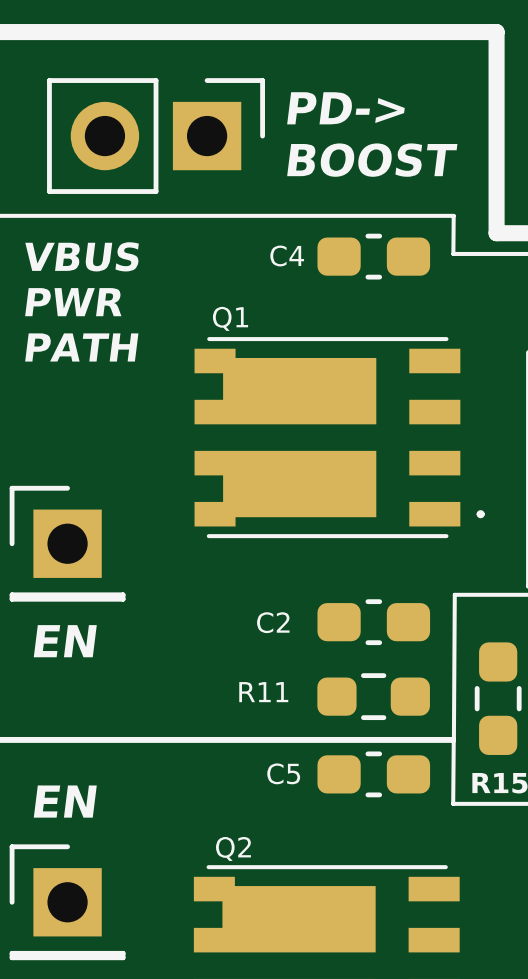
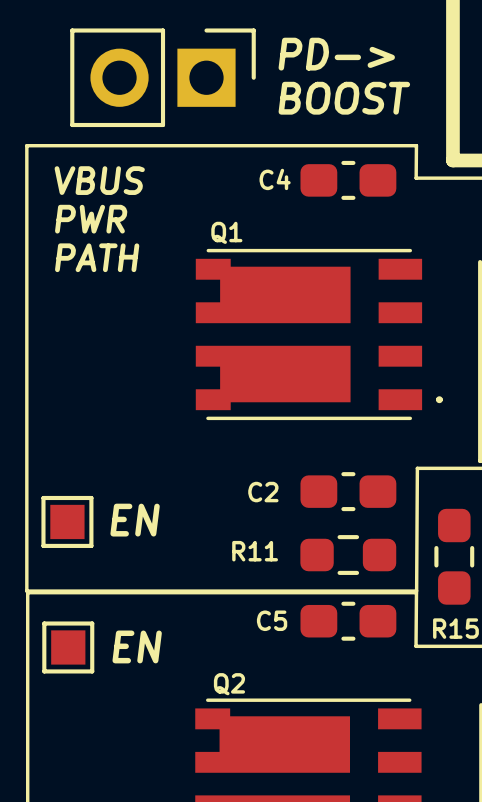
part: (67, 543) -> none
text position: EN (65, 641) -> EN (135, 520)
part: none -> (67, 521)
text position: EN (65, 801) -> EN (137, 646)
part: none -> (68, 647)
part: (67, 902) -> none

